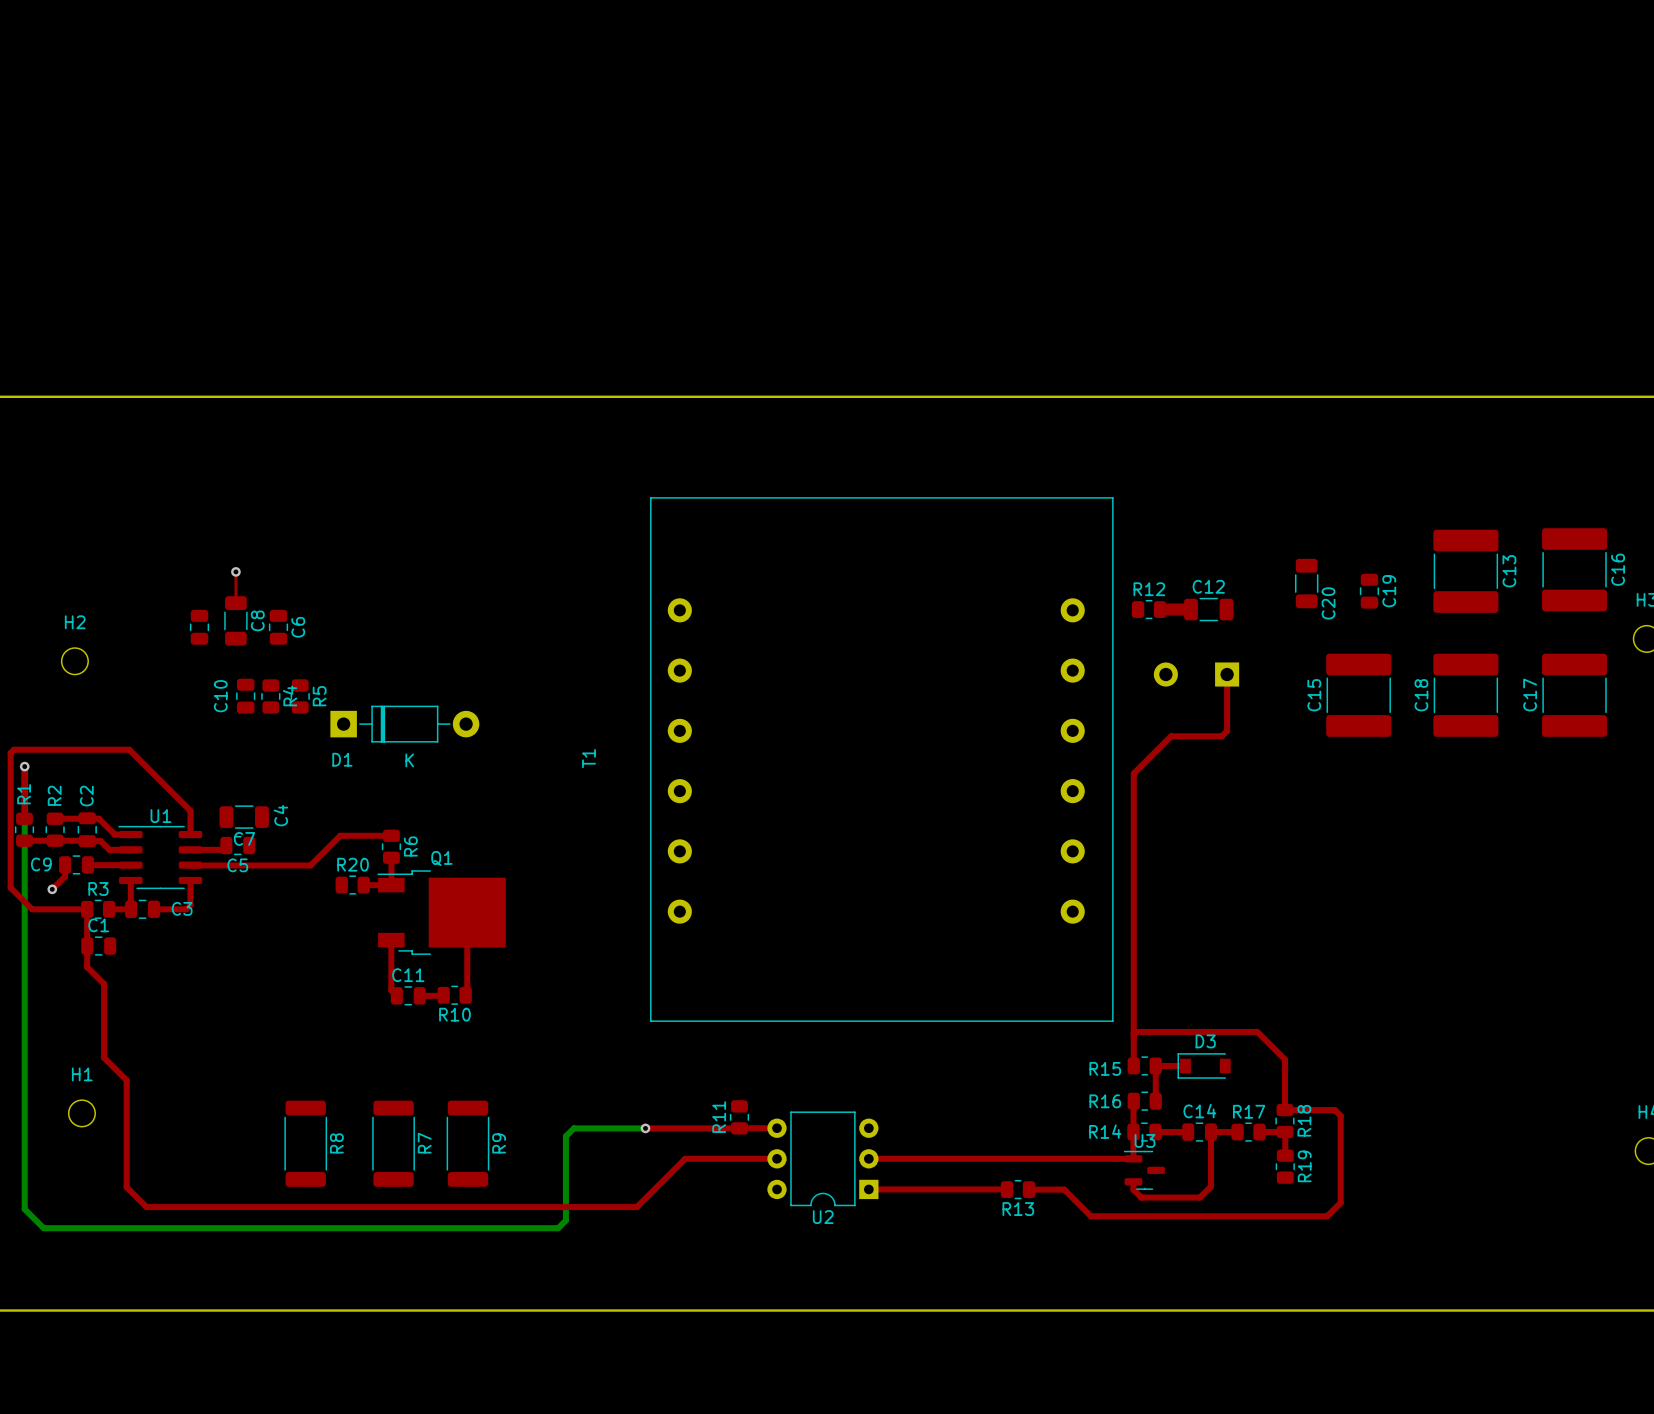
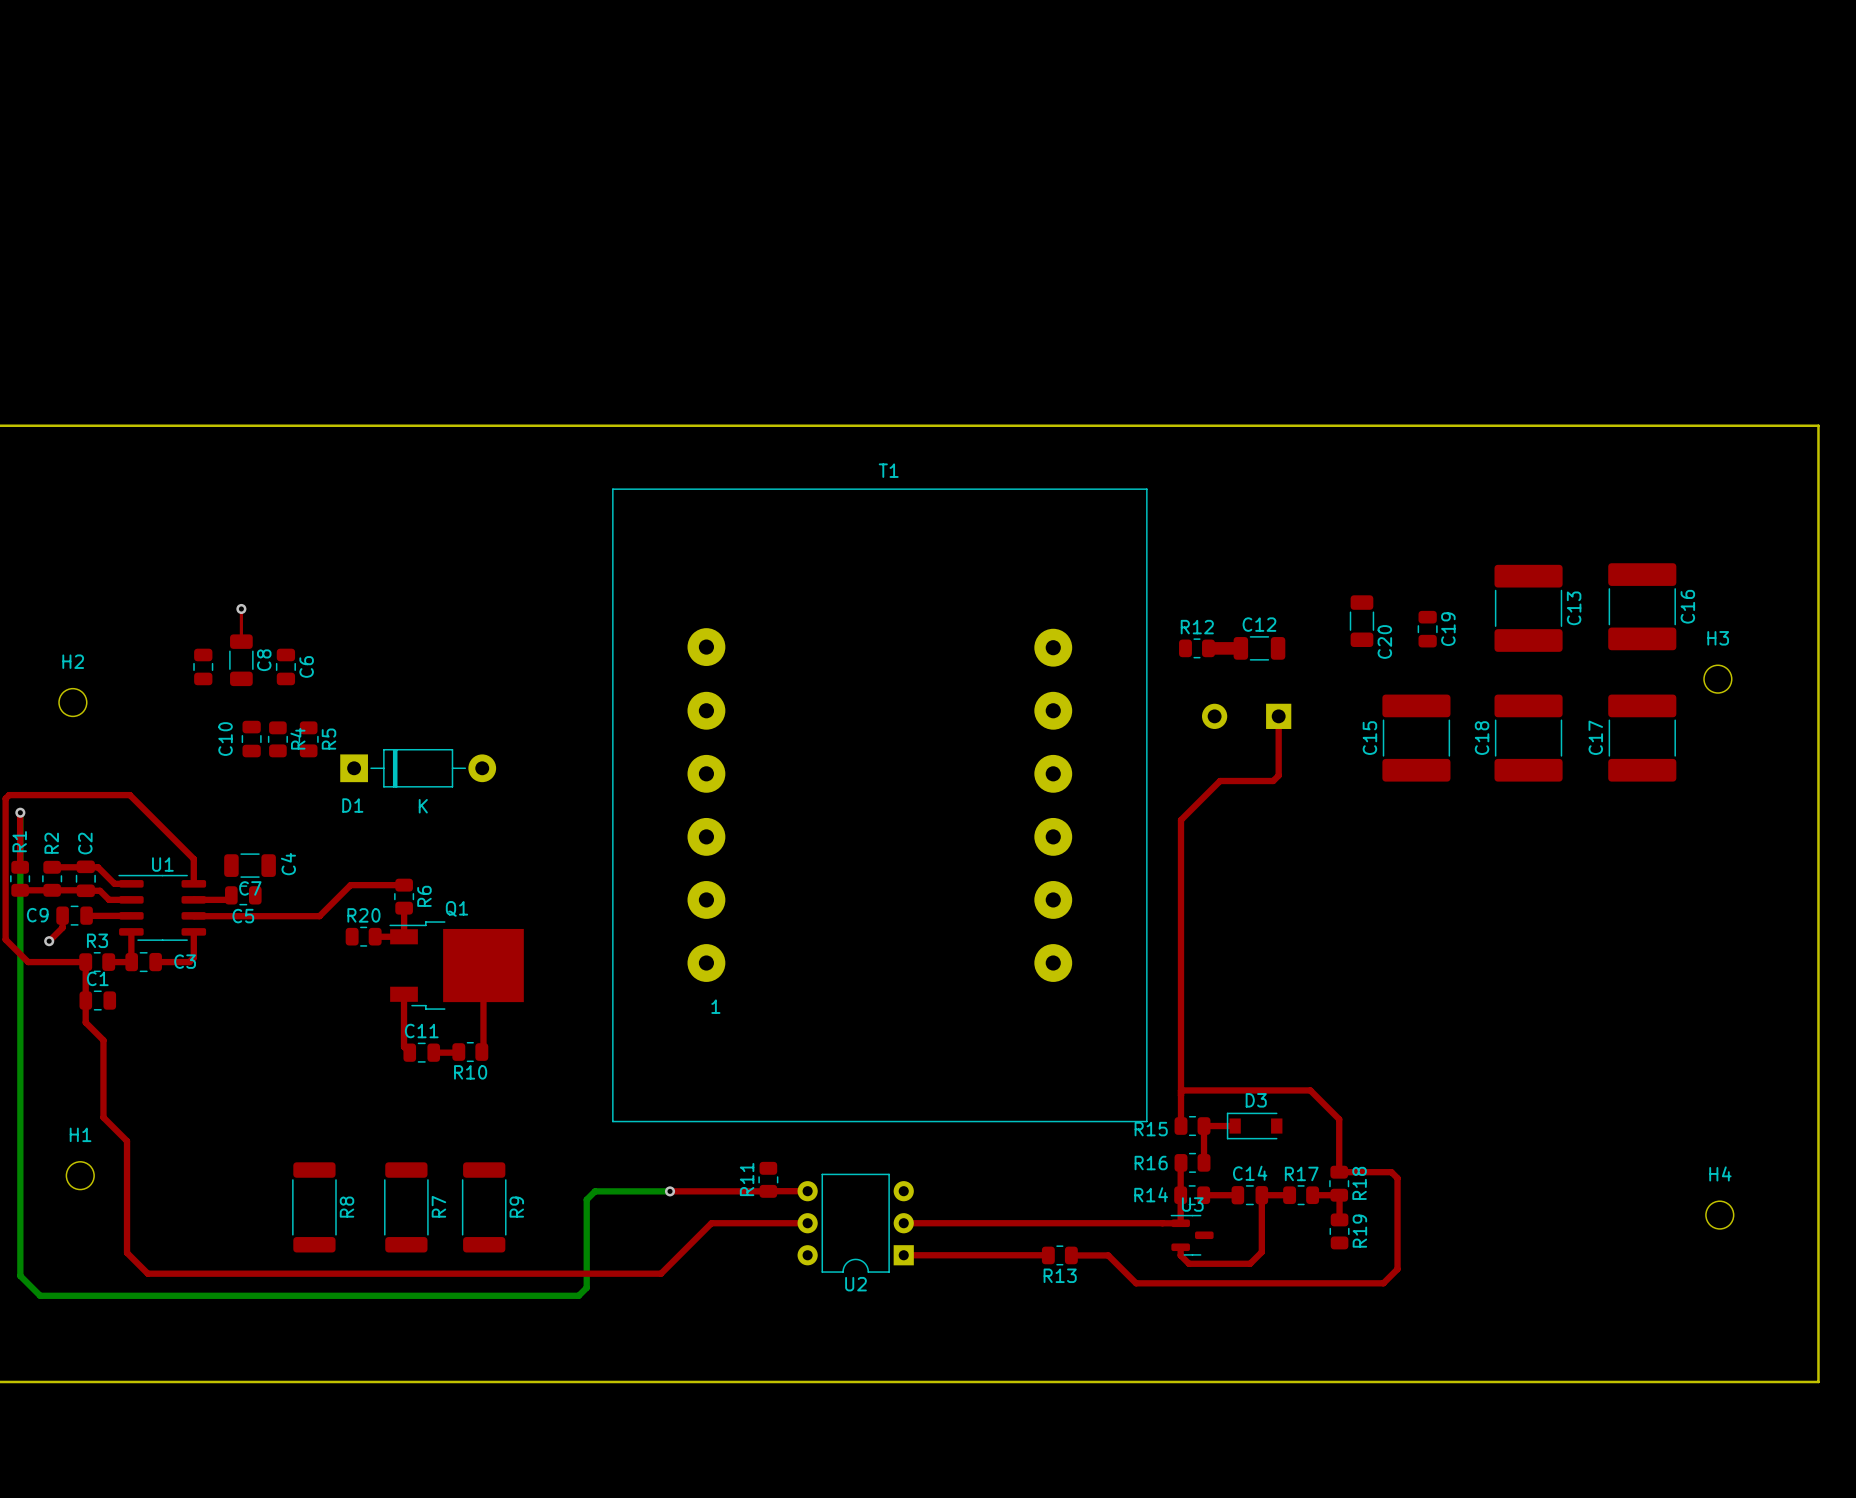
T1 footprint: [650, 497, 1114, 1022] -> [612, 488, 1148, 1123]
T1 name position: T1 (589, 758) -> T1 (888, 470)

